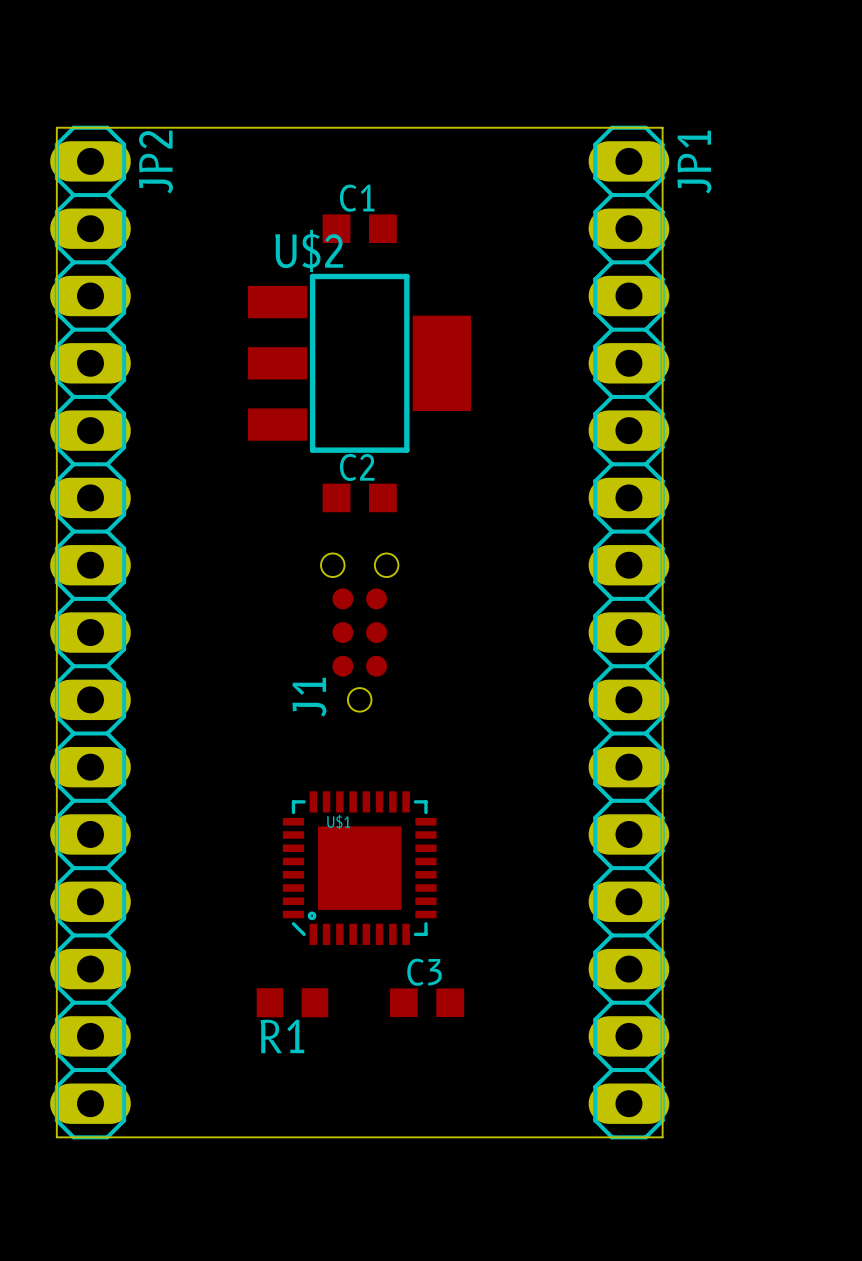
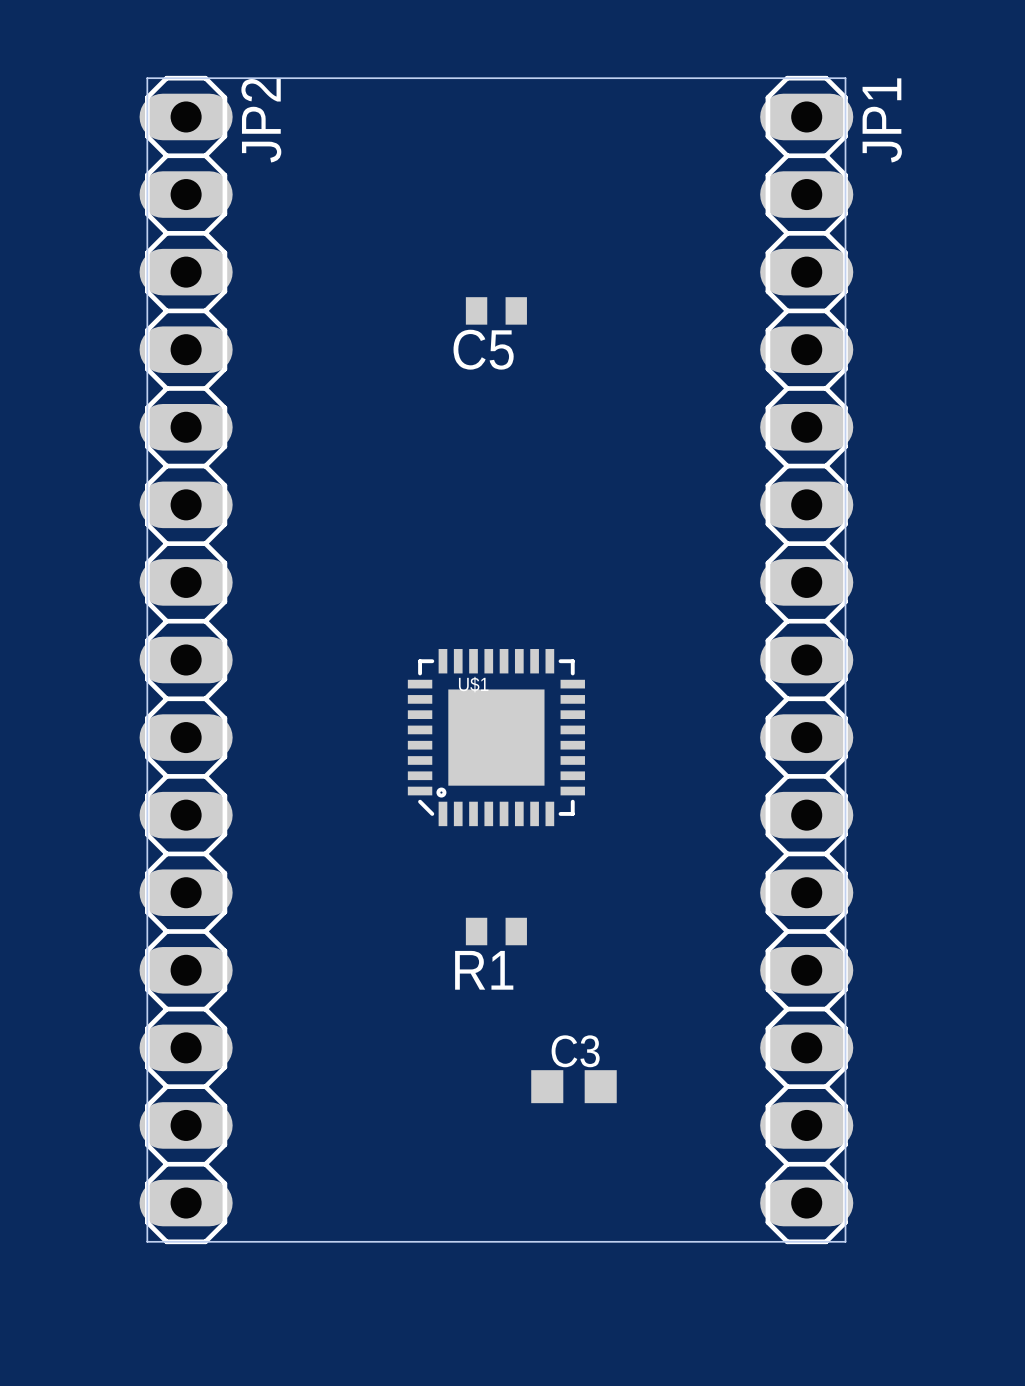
C1: (359, 228) -> none
C5: none -> (496, 310)
U$2: (359, 363) -> none
C2: (359, 497) -> none
J1: (359, 632) -> none
U$1 position: (359, 868) -> (496, 737)
R1 footprint: [256, 988, 329, 1018] -> [465, 917, 527, 946]

